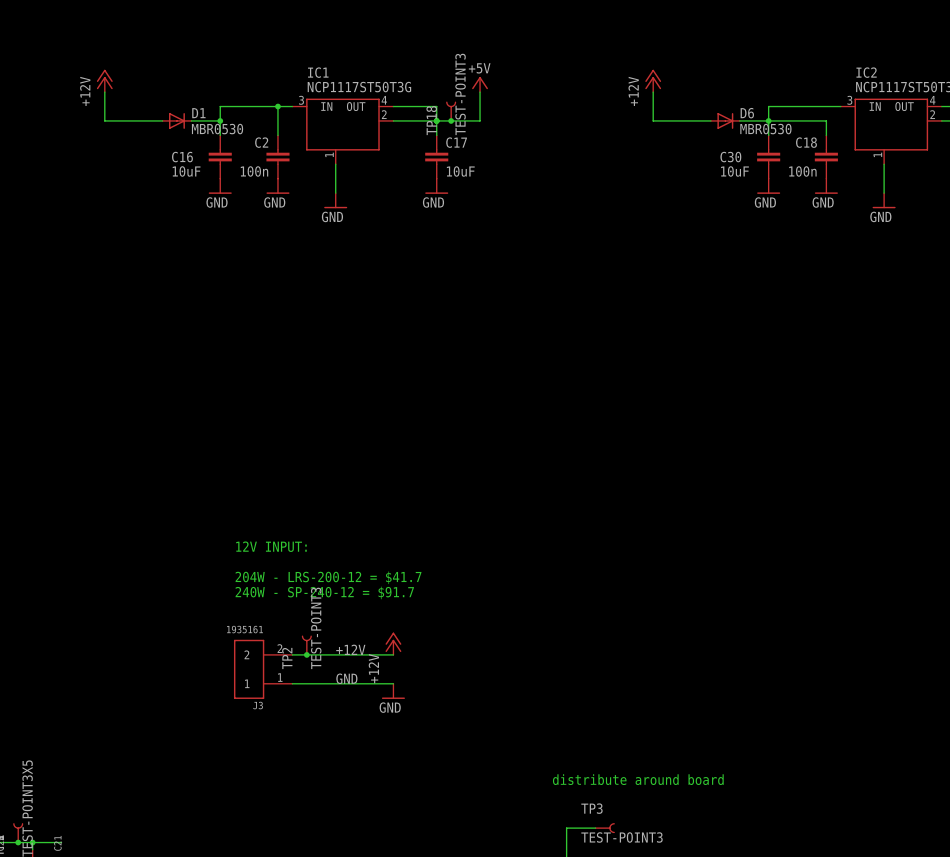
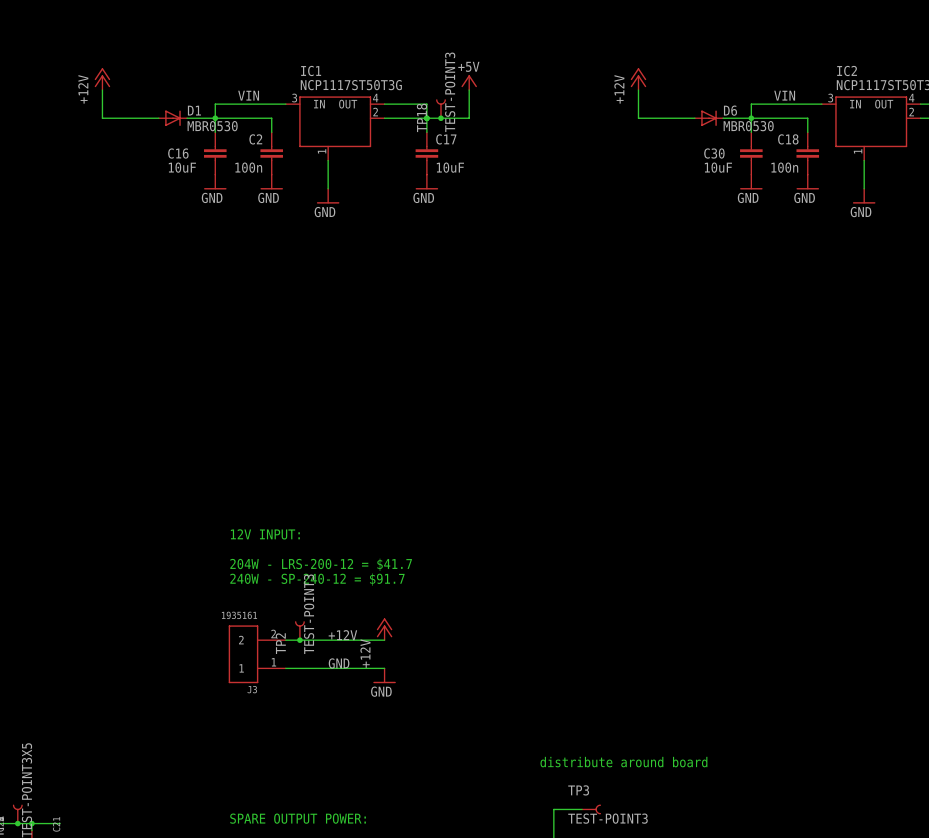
label: none -> VIN (248, 95)
label: none -> VIN (784, 95)
wire: (277, 106) (277, 120) -> (215, 118) (271, 118)
junction: (277, 106) -> none
text: none -> SPARE OUTPUT POWER: (298, 818)

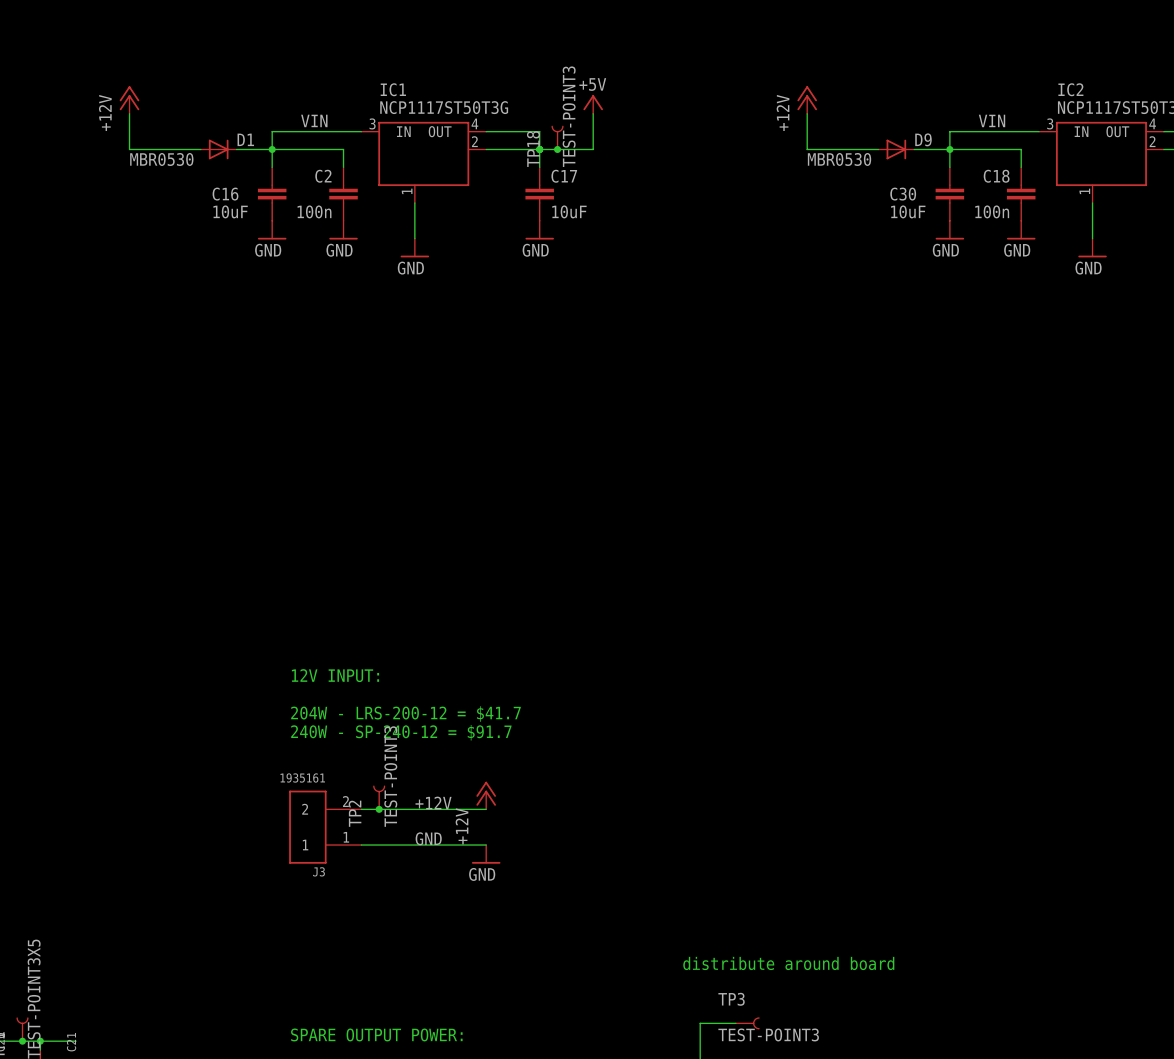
D6 name: D6 (730, 110) -> D9 (923, 139)
D1 value position: MBR0530 (212, 126) -> MBR0530 (161, 159)
D6 value position: MBR0530 (748, 126) -> MBR0530 (839, 159)

